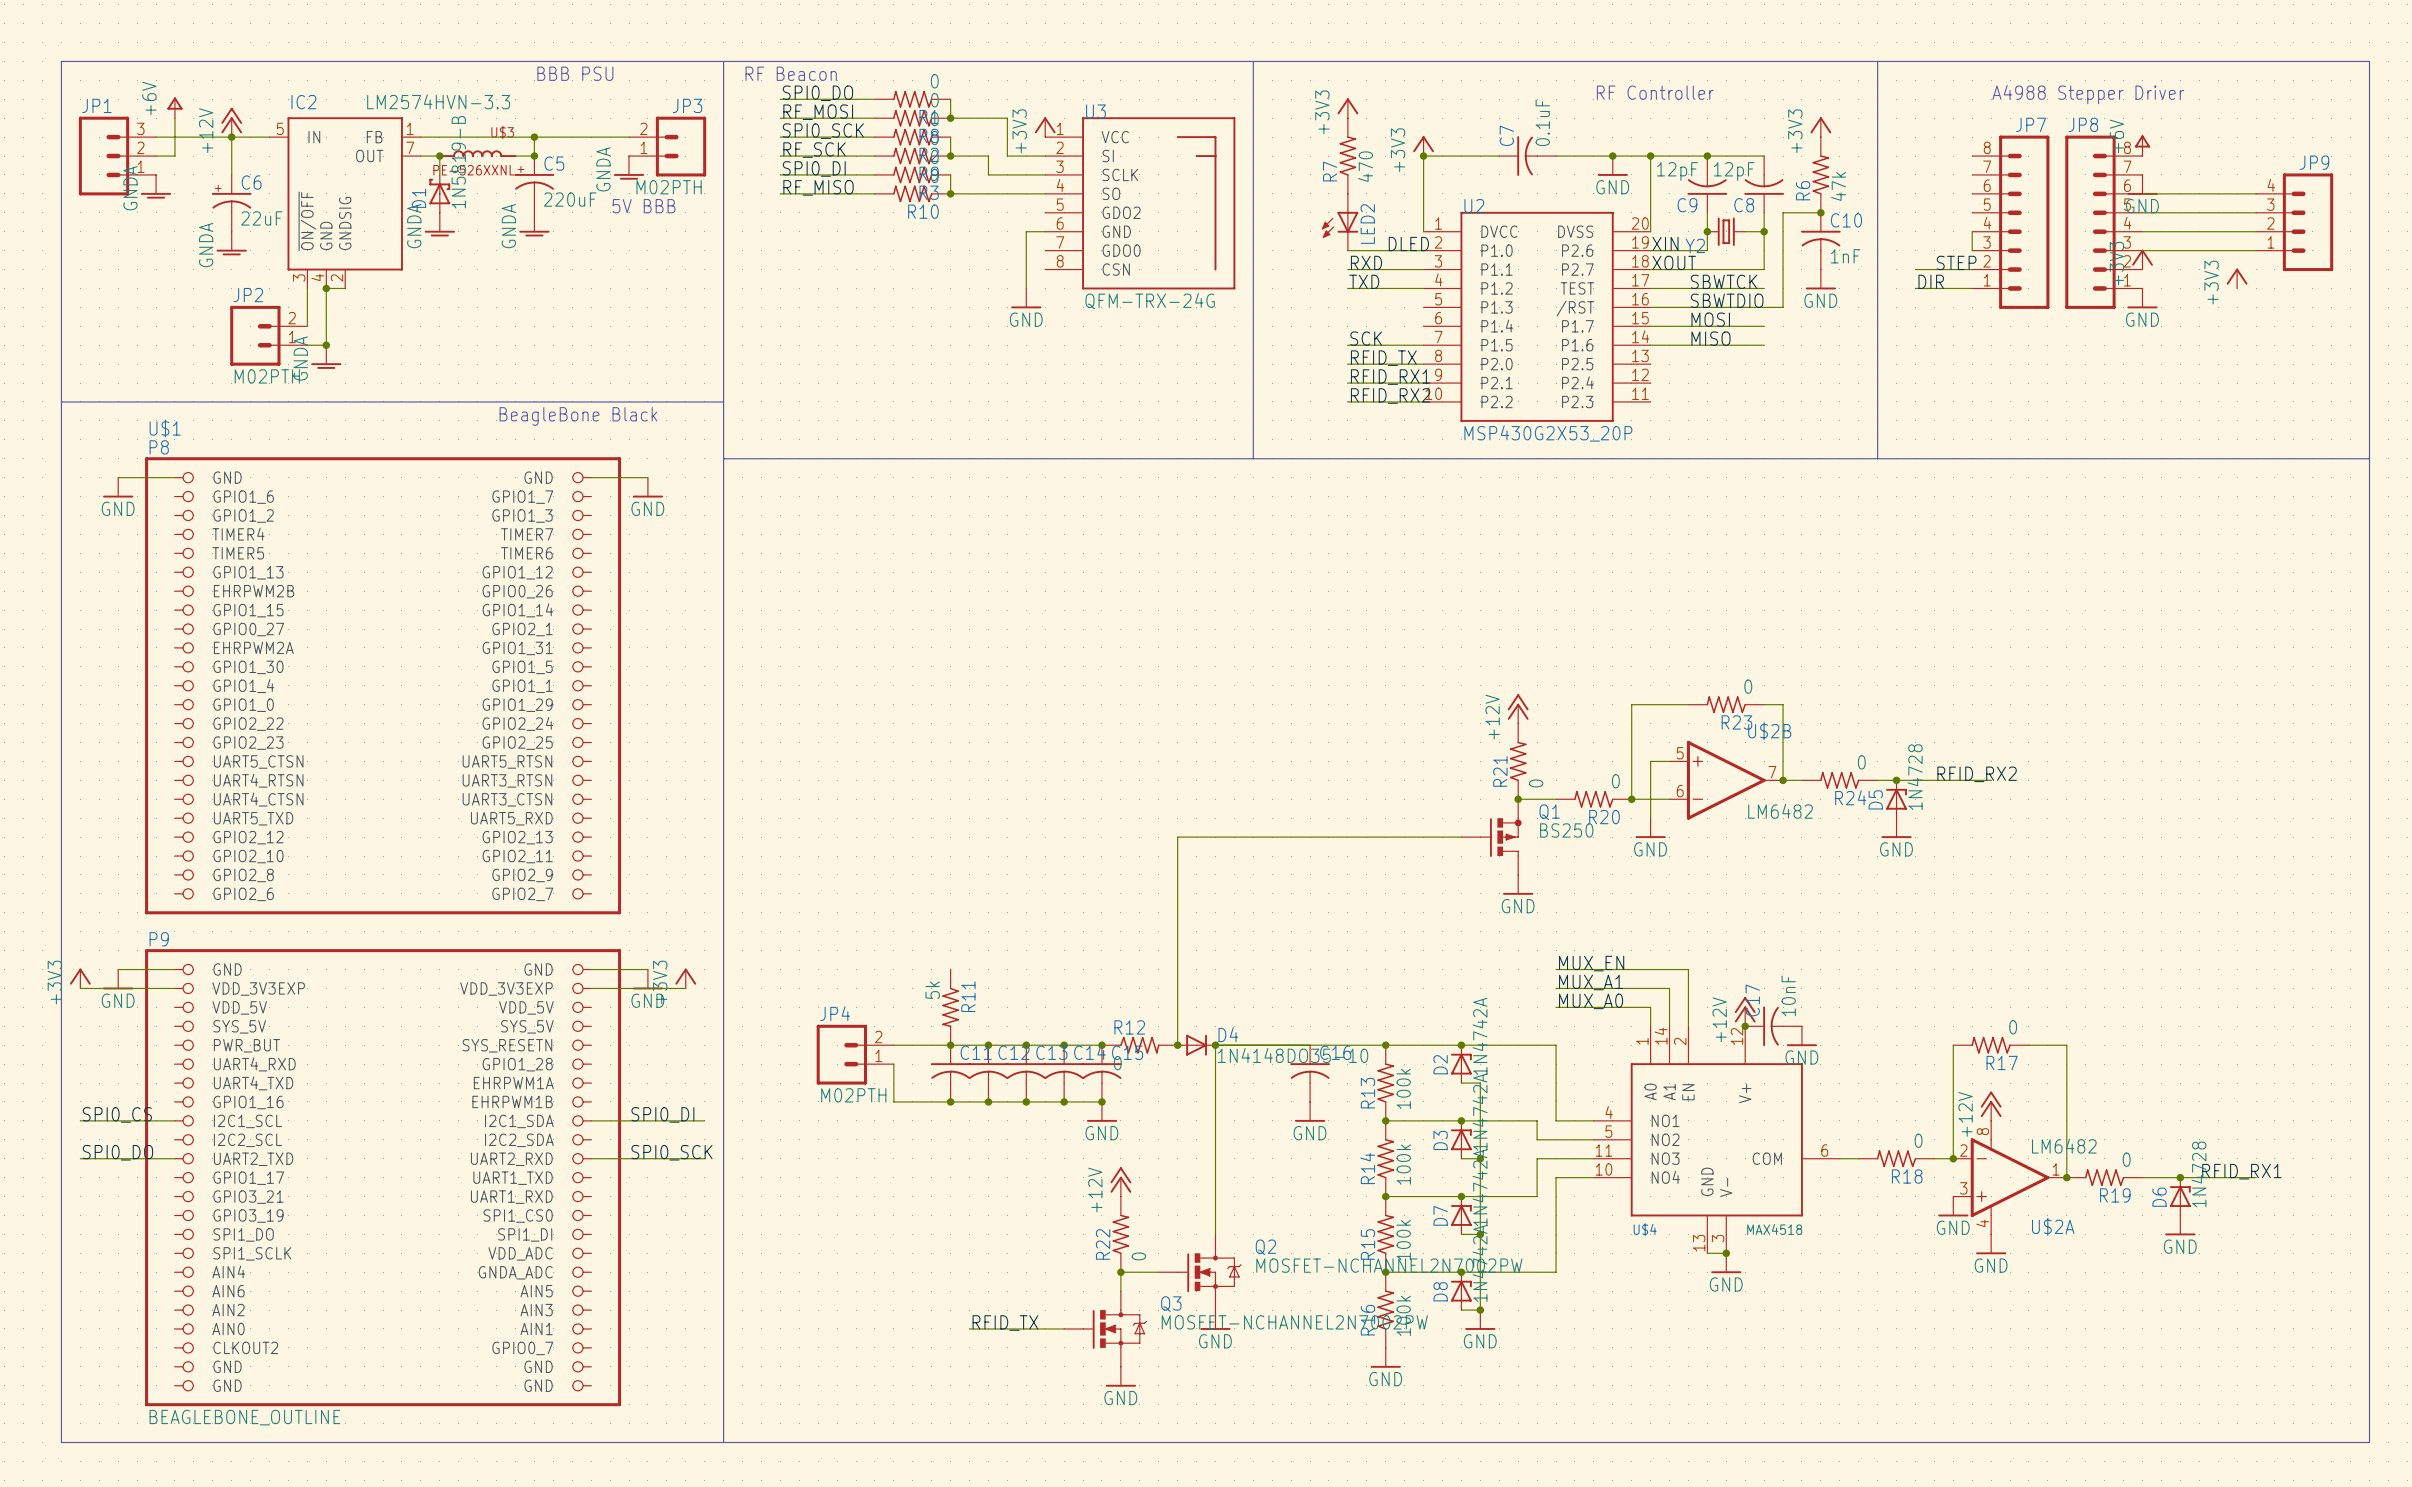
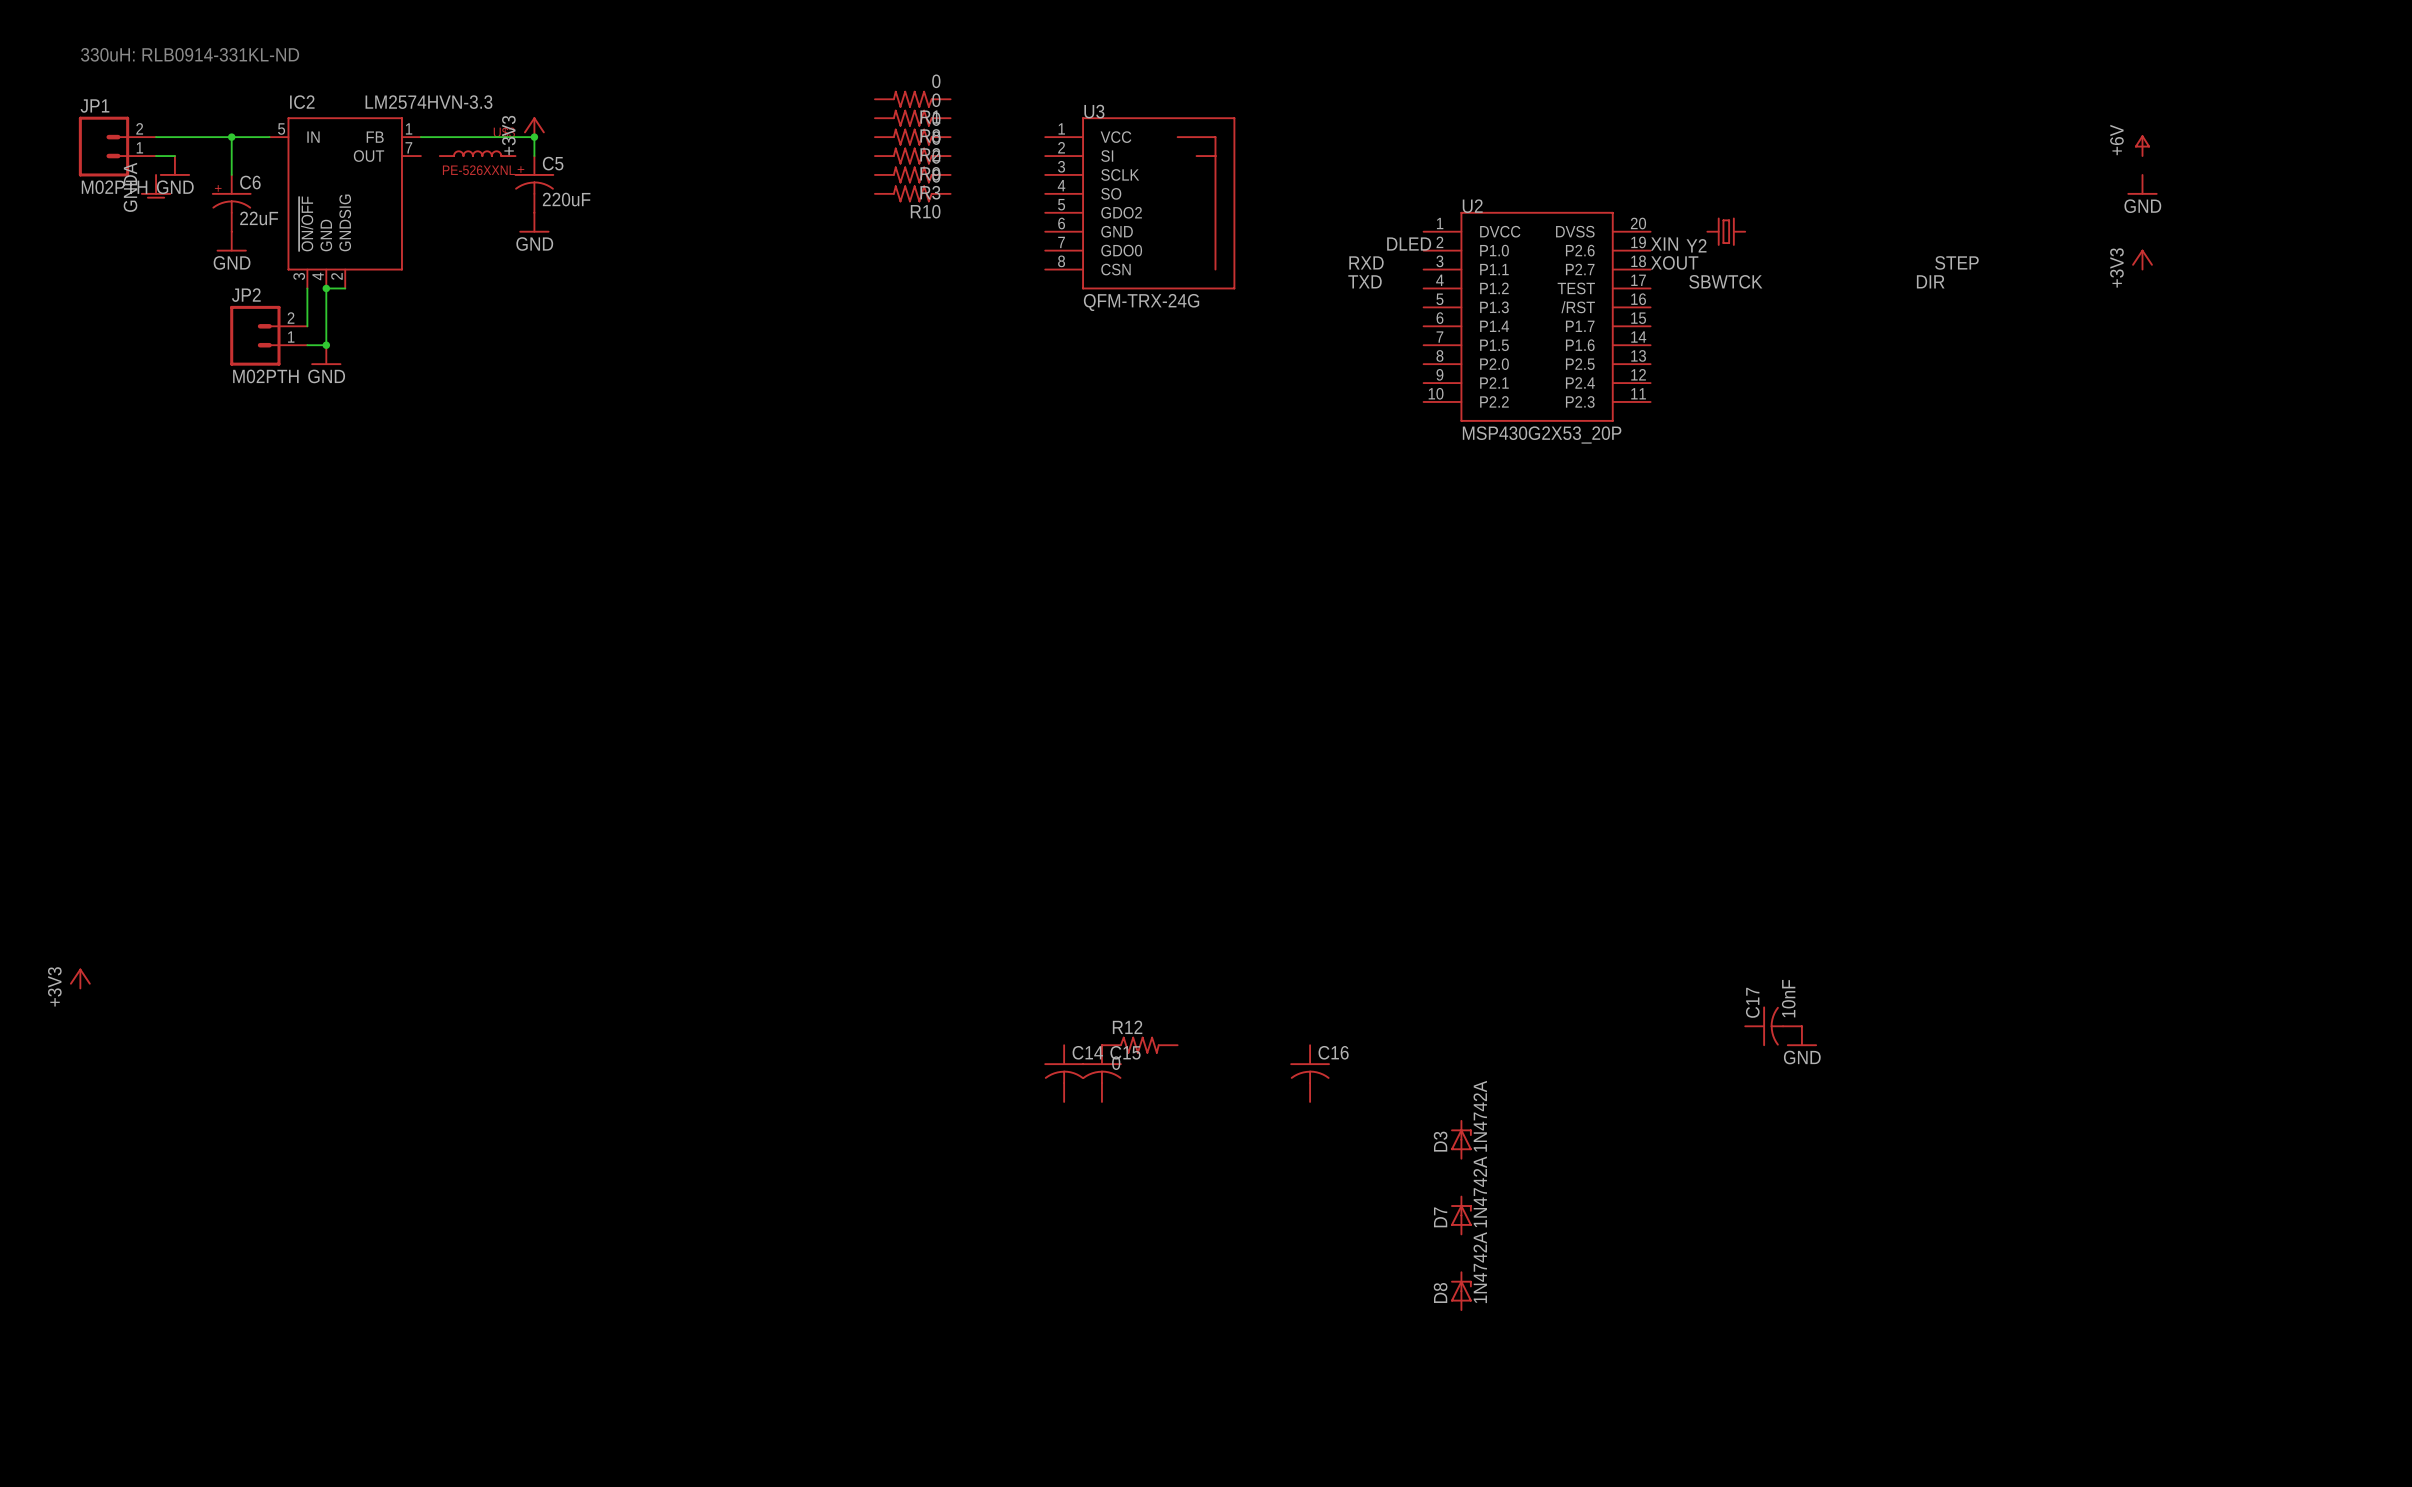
text: none -> 330uH: RLB0914-331KL-ND (190, 54)
line: (61, 61) (2369, 61) (2369, 1442) (61, 1442) (61, 61) -> none
line: (723, 61) (723, 1442) -> none
line: (1253, 61) (1253, 458) -> none
line: (1877, 61) (1877, 458) -> none
text: BBB PSU (575, 73) -> none
text: RF Beacon (791, 73) -> none
text: RF Controller (1655, 92) -> none
label: SPI0_DO (817, 93) -> none
text: A4988 Stepper Driver (2088, 94) -> none
wire: (780, 99) (874, 99) -> none
wire: (950, 99) (950, 118) (1007, 118) (1007, 156) (1045, 156) -> none
power symbol: +6V (174, 107) -> none
power symbol: +3V3 (1347, 108) -> none
label: RF_MOSI (818, 112) -> none
JP1 symbol: [78, 116, 157, 196] -> [78, 116, 157, 177]
wire: (174, 118) (174, 156) -> none
wire: (780, 118) (874, 118) -> none
junction: (950, 118) -> none
power symbol: +12V (231, 122) -> none
power symbol: none -> +3V3 (534, 127)
power symbol: +3V3 (1045, 127) -> none
power symbol: +3V3 (1820, 127) -> none
label: SPI0_SCK (823, 131) -> none
wire: (534, 137) (629, 137) -> none
wire: (780, 137) (874, 137) -> none
wire: (950, 137) (950, 156) (988, 156) (988, 174) (1045, 174) -> none
JP3: M02PTH (667, 146) -> none
power symbol: +3V3 (1423, 146) -> none
label: RF_SCK (814, 150) -> none
wire: (420, 156) (439, 156) (439, 174) -> none
junction: (439, 156) -> none
wire: (515, 156) (534, 156) -> none
junction: (534, 156) -> none
wire: (780, 156) (874, 156) -> none
junction: (950, 156) -> none
R7: 470 (1347, 156) -> none
junction: (1423, 156) -> none
wire: (1499, 156) (1423, 156) (1423, 231) -> none
C7: 0.1uF (1527, 156) -> none
wire: (1556, 156) (1764, 156) -> none
junction: (1612, 156) -> none
wire: (1650, 156) (1650, 231) -> none
junction: (1650, 156) -> none
junction: (1707, 156) -> none
power symbol: none -> GND (174, 165)
power symbol: GND (1612, 165) -> none
power symbol: GNDA (629, 167) -> none
label: SPI0_DI (814, 168) -> none
wire: (780, 174) (874, 174) -> none
wire: (950, 174) (950, 193) (1045, 193) -> none
R6: 47k (1820, 174) -> none
C9: 12pF (1707, 184) -> none
C8: 12pF (1764, 184) -> none
JP1 value: none -> M02PTH (114, 187)
label: RF_MISO (818, 187) -> none
D1: 1N5819-B (439, 193) -> none
wire: (780, 193) (874, 193) -> none
junction: (950, 193) -> none
wire: (2142, 193) (2256, 193) -> none
text: 5V BBB (643, 206) -> none
wire: (1707, 212) (1707, 250) (1650, 250) -> none
wire: (1764, 212) (1764, 269) (1650, 269) -> none
wire: (1820, 212) (1783, 212) (1783, 307) (1650, 307) -> none
junction: (1820, 212) -> none
wire: (2142, 212) (2256, 212) -> none
LED2: (1340, 222) -> none
JP7: (2010, 222) -> none
JP8: (2103, 222) -> none
JP9: (2294, 222) -> none
power symbol: GNDA (439, 224) -> none
power symbol: GNDA (534, 224) -> GND (534, 222)
wire: (1045, 231) (1026, 231) (1026, 288) -> none
junction: (1707, 231) -> none
wire: (1745, 231) (1764, 231) -> none
junction: (1764, 231) -> none
wire: (1972, 231) (1972, 250) -> none
wire: (2142, 231) (2256, 231) -> none
C10: 1nF (1820, 241) -> none
power symbol: GNDA (231, 243) -> GND (231, 241)
wire: (1347, 250) (1423, 250) -> none
wire: (2142, 250) (2256, 250) -> none
wire: (1347, 269) (1423, 269) -> none
wire: (1915, 269) (1972, 269) -> none
power symbol: +3V3 (2237, 278) -> none
power symbol: GND (1820, 279) -> none
wire: (1347, 288) (1423, 288) -> none
wire: (1650, 288) (1764, 288) -> none
wire: (1915, 288) (1972, 288) -> none
power symbol: GND (1026, 298) -> none
power symbol: GND (2142, 298) -> none
label: SBWTDIO (1727, 300) -> none
label: MOSI (1710, 319) -> none
wire: (1650, 326) (1764, 326) -> none
label: SCK (1366, 338) -> none
label: MISO (1710, 338) -> none
wire: (1347, 345) (1423, 345) -> none
wire: (1650, 345) (1764, 345) -> none
power symbol: GNDA (326, 357) -> GND (326, 355)
label: RFID_TX (1383, 358) -> none
wire: (1347, 364) (1423, 364) -> none
label: RFID_RX1 (1390, 377) -> none
wire: (1347, 383) (1423, 383) -> none
label: RFID_RX2 (1390, 395) -> none
line: (61, 401) (723, 401) -> none
wire: (1347, 401) (1423, 401) -> none
text: BeagleBone Black (578, 416) -> none
line: (723, 458) (2369, 458) -> none
wire: (118, 477) (174, 477) -> none
wire: (591, 477) (647, 477) -> none
power symbol: GND (118, 487) -> none
power symbol: GND (647, 487) -> none
wire: (1688, 704) (1631, 704) (1631, 799) (1669, 799) -> none
R23: 0 (1726, 704) -> none
wire: (1764, 704) (1783, 704) (1783, 780) (1801, 780) -> none
power symbol: +12V (1518, 708) -> none
R21: 0 (1518, 761) -> none
wire: (1669, 761) (1650, 761) (1650, 818) -> none
label: RFID_RX2 (1977, 774) -> none
U$2B: LM6482 (1726, 780) -> none
junction: (1783, 780) -> none
R24: 0 (1839, 780) -> none
wire: (1877, 780) (1991, 780) -> none
junction: (1896, 780) -> none
wire: (1518, 799) (1556, 799) -> none
junction: (1518, 799) -> none
R20: 0 (1593, 799) -> none
junction: (1631, 799) -> none
D5: 1N4728 (1896, 799) -> none
power symbol: GND (1650, 828) -> none
power symbol: GND (1896, 828) -> none
wire: (1461, 837) (1177, 837) (1177, 1045) -> none
Q1: BS250 (1491, 837) -> none
power symbol: GND (1518, 884) -> none
U$1: BEAGLEBONE_OUTLINE (383, 931) -> none
label: MUX_EN (1591, 963) -> none
wire: (118, 969) (174, 969) -> none
wire: (591, 969) (647, 969) -> none
wire: (1556, 969) (1688, 969) (1688, 1026) -> none
power symbol: +3V3 (685, 978) -> none
power symbol: GND (118, 979) -> none
power symbol: GND (647, 979) -> none
label: MUX_A1 (1591, 982) -> none
wire: (80, 988) (174, 988) -> none
wire: (591, 988) (685, 988) -> none
wire: (1556, 988) (1669, 988) (1669, 1026) -> none
label: MUX_A0 (1591, 1001) -> none
R11: 5k (950, 1007) -> none
wire: (1556, 1007) (1650, 1007) (1650, 1026) -> none
power symbol: +12V (1745, 1011) -> none
junction: (1745, 1026) -> none
wire: (893, 1045) (1101, 1045) -> none
junction: (950, 1045) -> none
junction: (988, 1045) -> none
junction: (1026, 1045) -> none
junction: (1064, 1045) -> none
junction: (1101, 1045) -> none
junction: (1177, 1045) -> none
D4: 1N4148DO35-10 (1196, 1045) -> none
junction: (1215, 1045) -> none
junction: (1385, 1045) -> none
junction: (1461, 1045) -> none
wire: (1953, 1045) (1953, 1158) (1934, 1158) -> none
R17: 0 (1991, 1045) -> none
wire: (2028, 1045) (2066, 1045) (2066, 1177) -> none
JP4: M02PTH (855, 1054) -> none
wire: (893, 1064) (893, 1101) (1101, 1101) -> none
D2: 1N4742A (1461, 1064) -> none
C11: (950, 1073) -> none
C12: (988, 1073) -> none
C13: (1026, 1073) -> none
R13: 100k (1385, 1083) -> none
wire: (1461, 1083) (1480, 1083) (1480, 1310) (1461, 1310) -> none
junction: (950, 1101) -> none
junction: (988, 1101) -> none
junction: (1026, 1101) -> none
junction: (1064, 1101) -> none
junction: (1101, 1101) -> none
power symbol: +12V (1991, 1106) -> none
power symbol: GND (1101, 1111) -> none
power symbol: GND (1310, 1111) -> none
label: SPI0_CS (117, 1114) -> none
label: SPI0_DI (662, 1114) -> none
wire: (80, 1120) (174, 1120) -> none
wire: (591, 1120) (704, 1120) -> none
wire: (1385, 1120) (1537, 1120) (1537, 1139) (1593, 1139) -> none
junction: (1385, 1120) -> none
junction: (1461, 1120) -> none
wire: (1593, 1120) (1556, 1120) (1556, 1045) (1215, 1045) (1215, 1234) -> none
U$4: MAX4518 (1716, 1139) -> none
label: SPI0_DO (117, 1152) -> none
label: SPI0_SCK (671, 1152) -> none
wire: (80, 1158) (174, 1158) -> none
wire: (591, 1158) (704, 1158) -> none
R14: 100k (1385, 1158) -> none
wire: (1461, 1158) (1480, 1158) -> none
junction: (1480, 1158) -> none
wire: (1593, 1158) (1537, 1158) (1537, 1196) (1385, 1196) -> none
wire: (1839, 1158) (1858, 1158) -> none
R18: 0 (1896, 1158) -> none
junction: (1953, 1158) -> none
label: RFID_RX1 (2241, 1171) -> none
wire: (1593, 1177) (1556, 1177) (1556, 1272) (1385, 1272) -> none
U$2A: LM6482 (2010, 1177) -> none
junction: (2066, 1177) -> none
R19: 0 (2104, 1177) -> none
wire: (2142, 1177) (2256, 1177) -> none
junction: (2180, 1177) -> none
power symbol: +12V (1120, 1181) -> none
junction: (1385, 1196) -> none
junction: (1461, 1196) -> none
D6: 1N4728 (2180, 1196) -> none
power symbol: GND (1953, 1206) -> none
power symbol: GND (2180, 1225) -> none
R22: 0 (1120, 1234) -> none
R15: 100k (1385, 1234) -> none
wire: (1461, 1234) (1480, 1234) -> none
junction: (1480, 1234) -> none
power symbol: GND (1991, 1244) -> none
wire: (1707, 1253) (1726, 1253) -> none
junction: (1726, 1253) -> none
power symbol: GND (1726, 1263) -> none
junction: (1120, 1272) -> none
wire: (1158, 1272) (1120, 1272) (1120, 1291) -> none
Q2: MOSFET-NCHANNEL2N7002PW (1200, 1272) -> none
junction: (1385, 1272) -> none
junction: (1461, 1272) -> none
R16: 100k (1385, 1310) -> none
junction: (1480, 1310) -> none
power symbol: GND (1215, 1320) -> none
power symbol: GND (1480, 1320) -> none
label: RFID_TX (1005, 1323) -> none
wire: (969, 1328) (1064, 1328) -> none
Q3: MOSFET-NCHANNEL2N7002PW (1105, 1328) -> none
power symbol: GND (1385, 1357) -> none
power symbol: GND (1120, 1376) -> none

